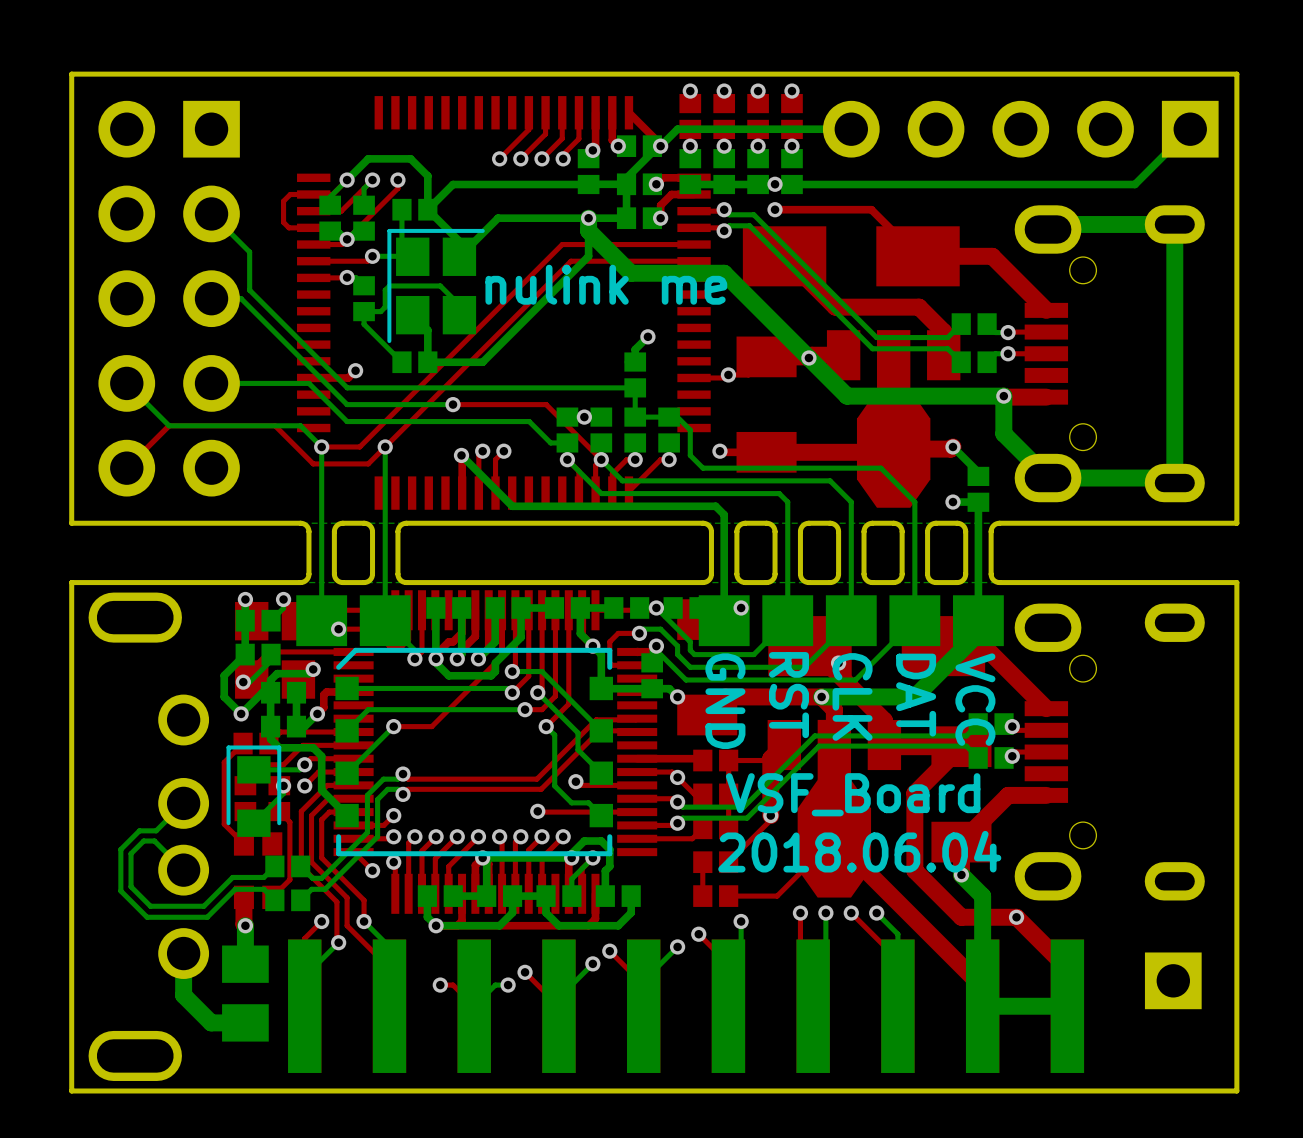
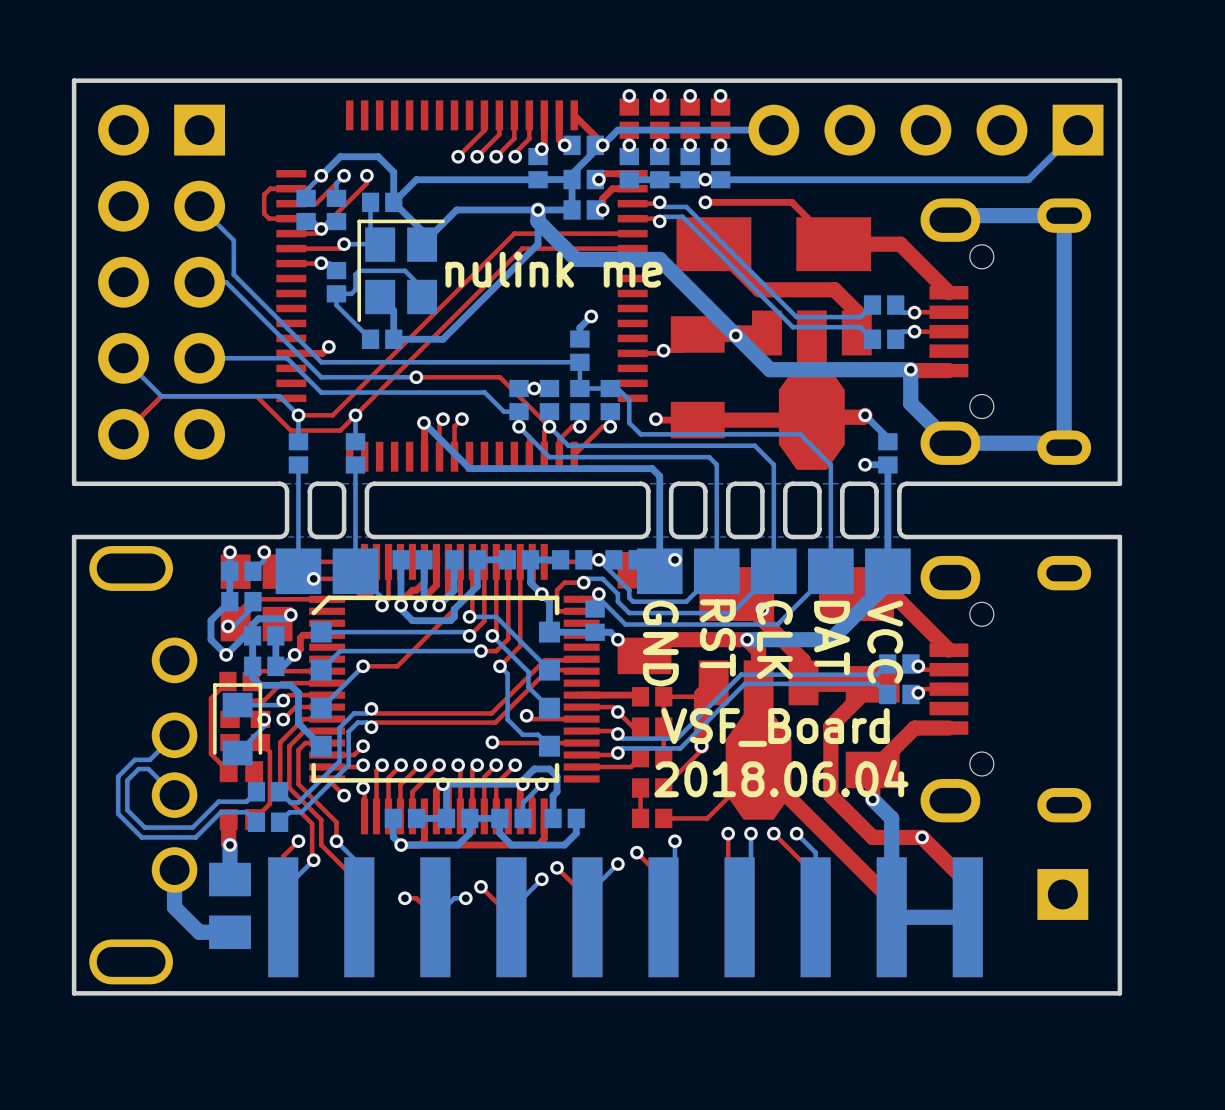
bottom track: (321, 476) (321, 502) -> none
bottom track: (385, 476) (385, 502) -> none
part: none -> (298, 453)
part: none -> (355, 453)

